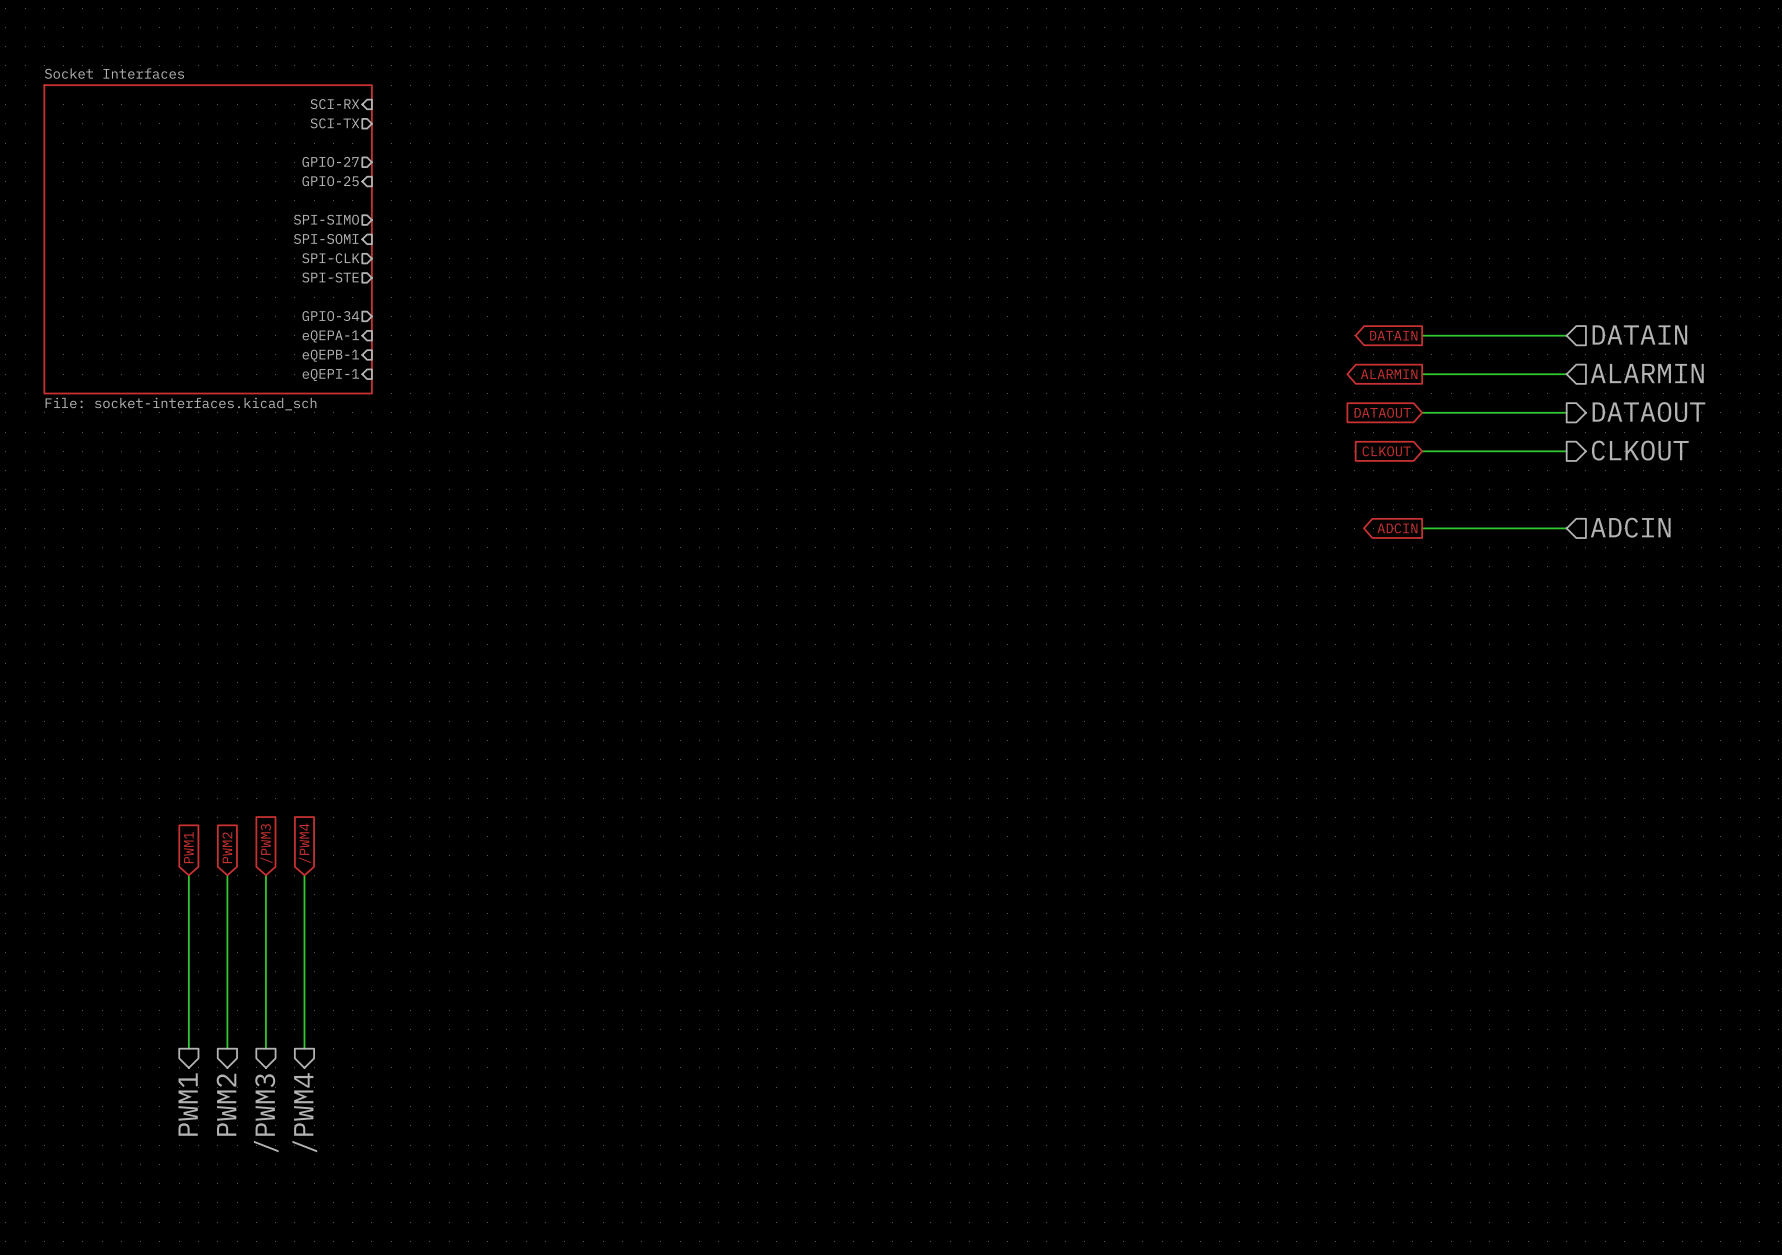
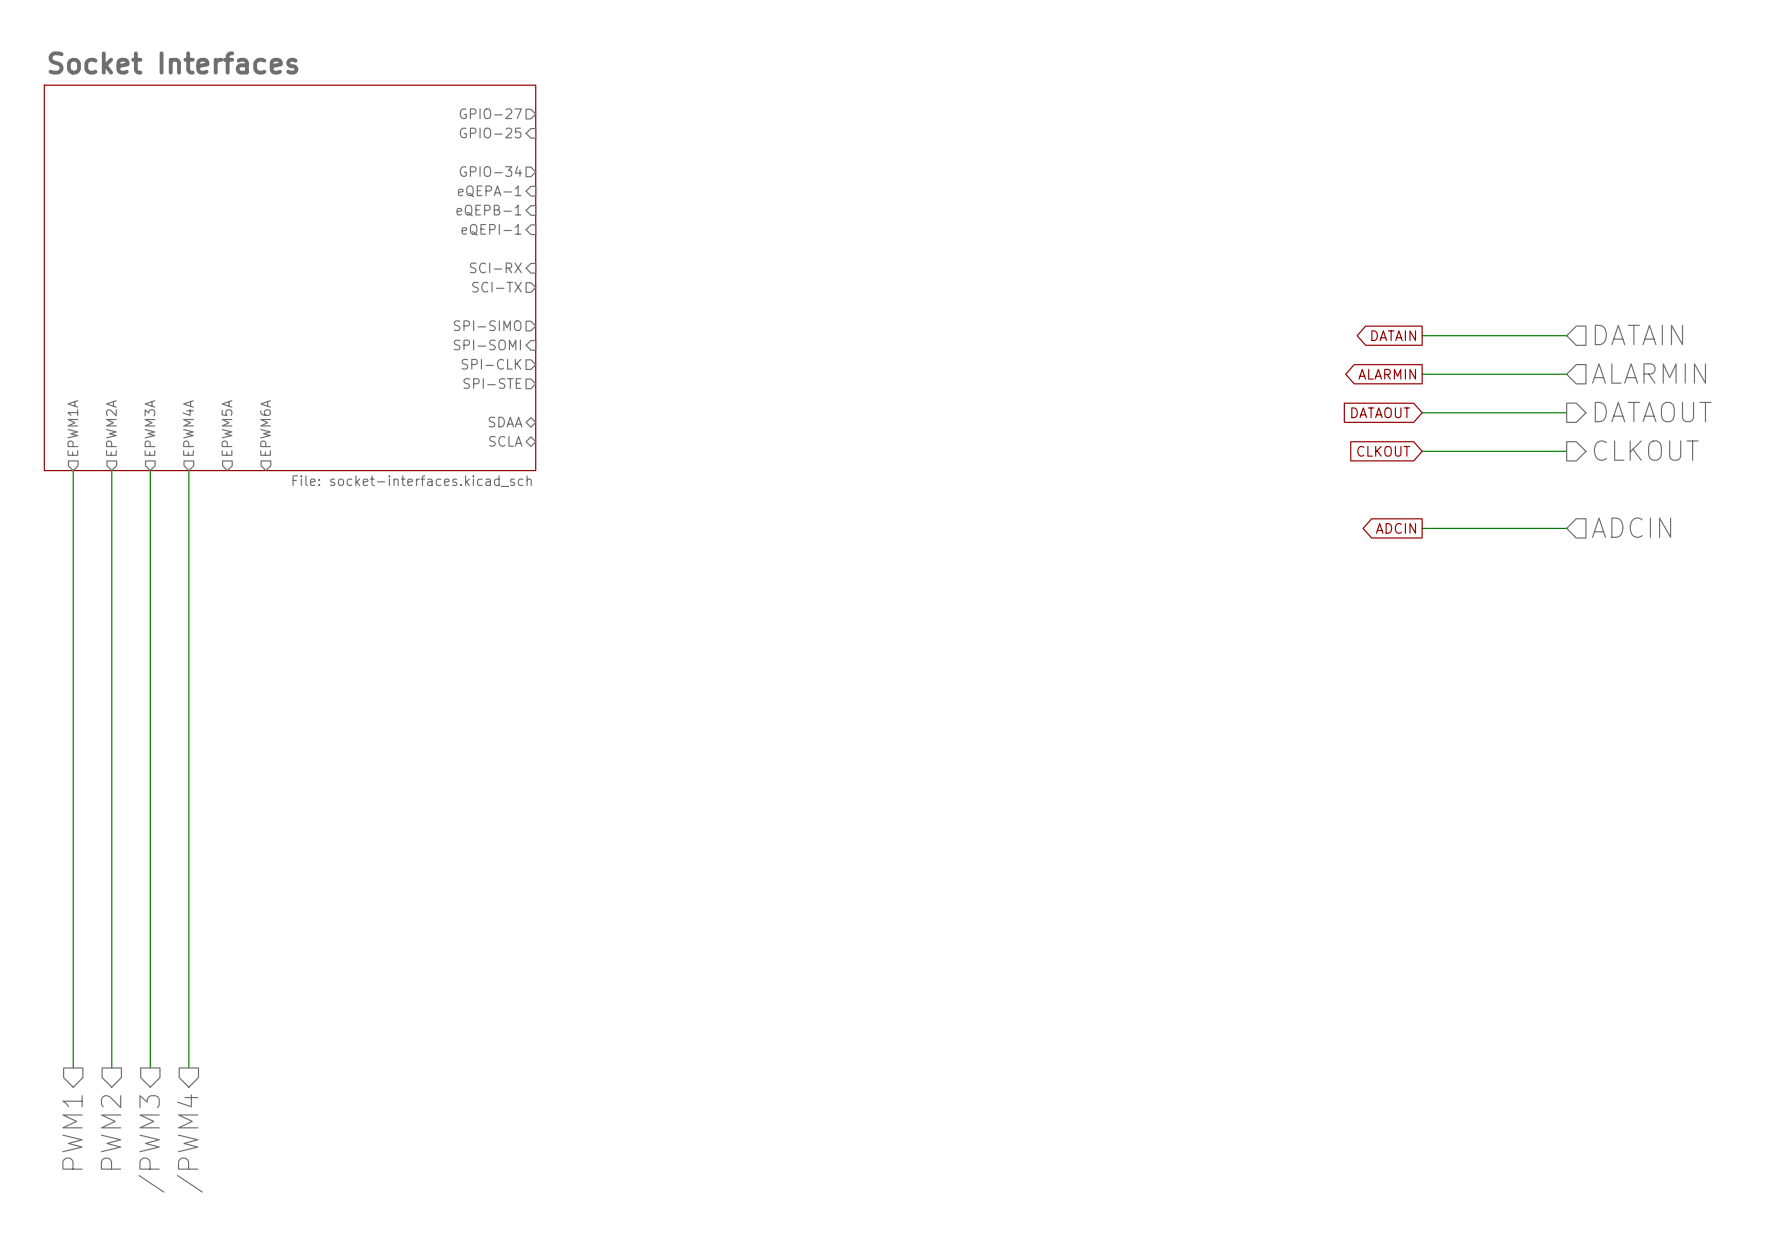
sheet pin: SCI-RX (334, 104) -> none
sheet pin: SCI-TX (334, 123) -> none
sheet pin position: GPIO-27 (330, 161) -> GPIO-27 (490, 113)
sheet pin: none -> GPIO-34 (490, 171)
sheet pin position: GPIO-25 (330, 181) -> GPIO-25 (490, 133)
sheet pin: none -> eQEPA-1 (489, 191)
sheet pin: none -> eQEPB-1 (489, 210)
sheet pin: SPI-SIMO (326, 219) -> none
sheet pin: none -> eQEPI-1 (491, 229)
sheet pin: SPI-SOMI (326, 238) -> none
sheet Socket Interfaces: File: socket-interfaces.kicad_sch (208, 239) -> none
sheet pin: SPI-CLK (330, 258) -> none
sheet pin: none -> SCI-RX (495, 267)
sheet Socket Interfaces: none -> File: socket-interfaces.kicad_sch (290, 277)
sheet pin: SPI-STE (330, 277) -> none
sheet pin: none -> SCI-TX (497, 287)
sheet pin: GPIO-34 (330, 316) -> none
sheet pin: none -> SPI-SIMO (487, 325)
sheet pin: eQEPA-1 (330, 336) -> none
sheet pin: none -> SPI-SOMI (487, 344)
sheet pin: eQEPB-1 (330, 355) -> none
sheet pin: none -> SPI-CLK (491, 364)
sheet pin: eQEPI-1 (330, 374) -> none
sheet pin: none -> SPI-STE (492, 383)
sheet pin: none -> SDAA (505, 422)
sheet pin: none -> EPWM1A (72, 428)
sheet pin: none -> EPWM2A (111, 428)
sheet pin: none -> EPWM3A (149, 428)
sheet pin: none -> EPWM4A (188, 428)
sheet pin: none -> EPWM5A (227, 428)
sheet pin: none -> EPWM6A (265, 428)
sheet pin: none -> SCLA (505, 441)
wire: none -> (73, 470) (73, 1067)
wire: none -> (111, 470) (111, 1067)
wire: none -> (150, 470) (150, 1067)
wire: none -> (188, 470) (188, 875)
global label: /PWM3 (266, 843) -> none
global label: /PWM4 (305, 843) -> none
global label: PWM1 (188, 847) -> none
global label: PWM2 (227, 847) -> none
wire: (227, 875) (227, 1048) -> none
wire: (265, 875) (265, 1048) -> none
wire: (304, 875) (304, 1048) -> none
wire: none -> (188, 1048) (188, 1067)
hierarchical label position: PWM1 (188, 1104) -> PWM1 (72, 1132)
hierarchical label position: PWM2 (226, 1104) -> PWM2 (111, 1132)
hierarchical label position: /PWM4 (304, 1112) -> /PWM4 (189, 1143)
hierarchical label position: /PWM3 (266, 1113) -> /PWM3 (151, 1143)

